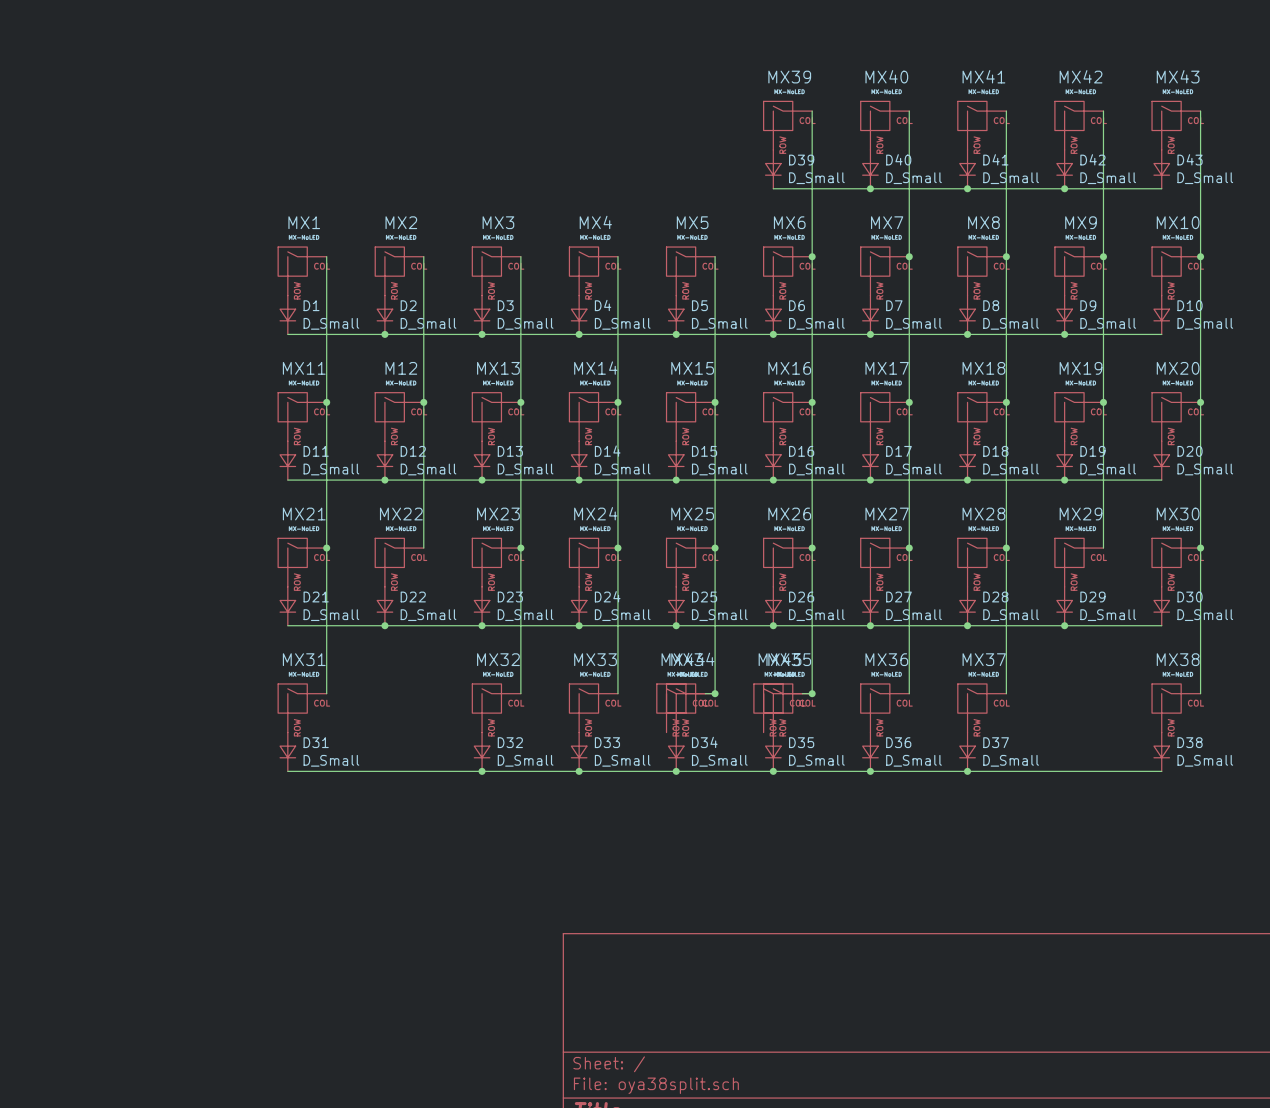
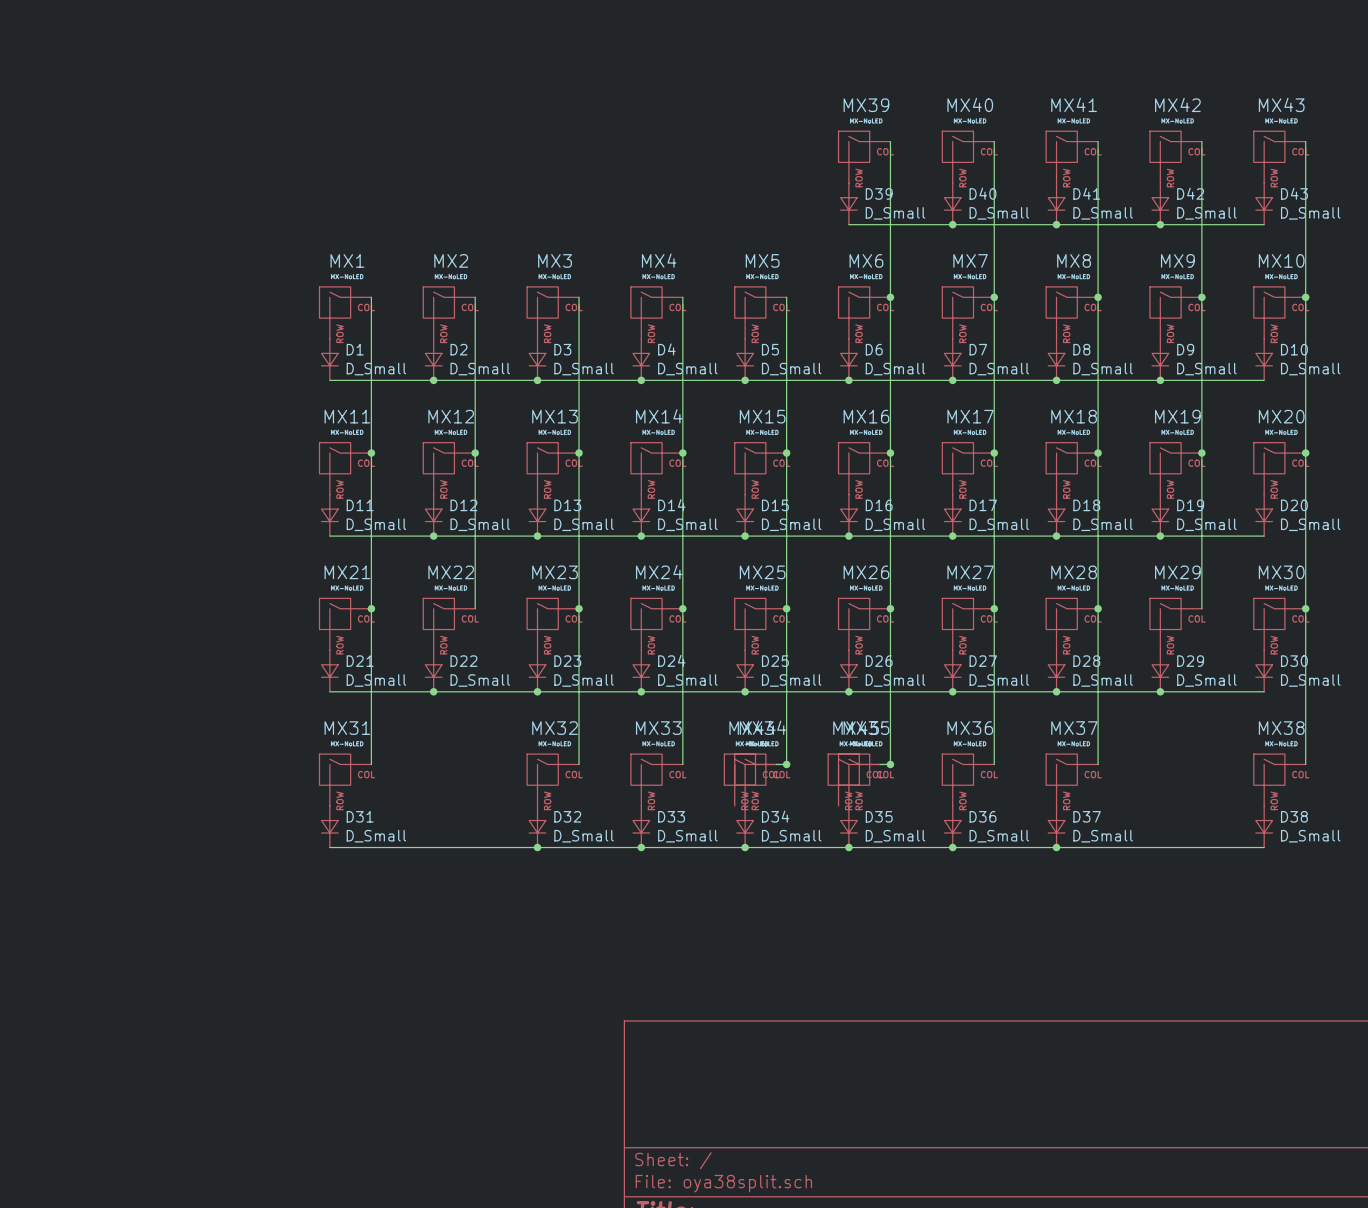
M12 name: M12 (401, 368) -> MX12 (451, 416)

